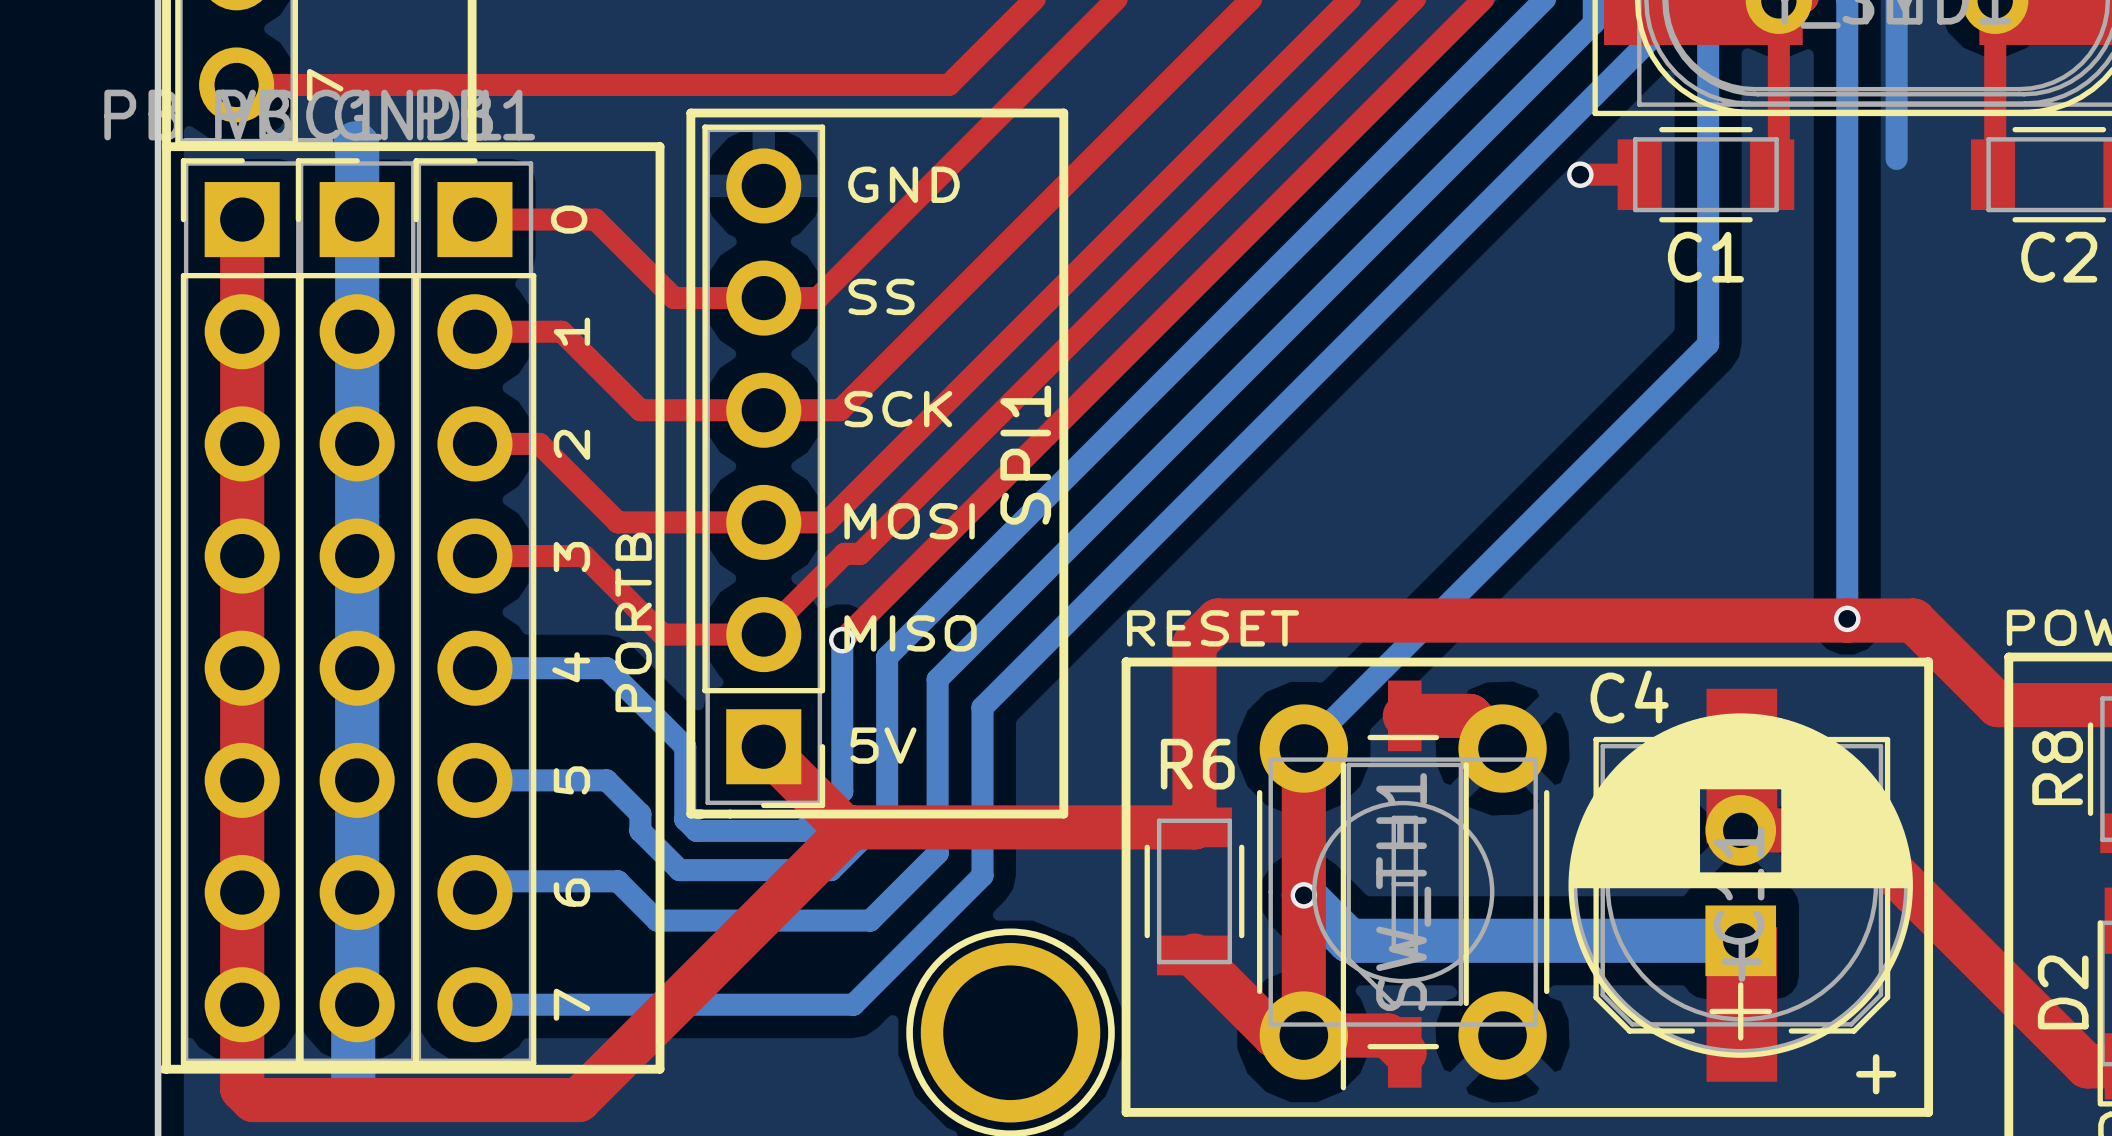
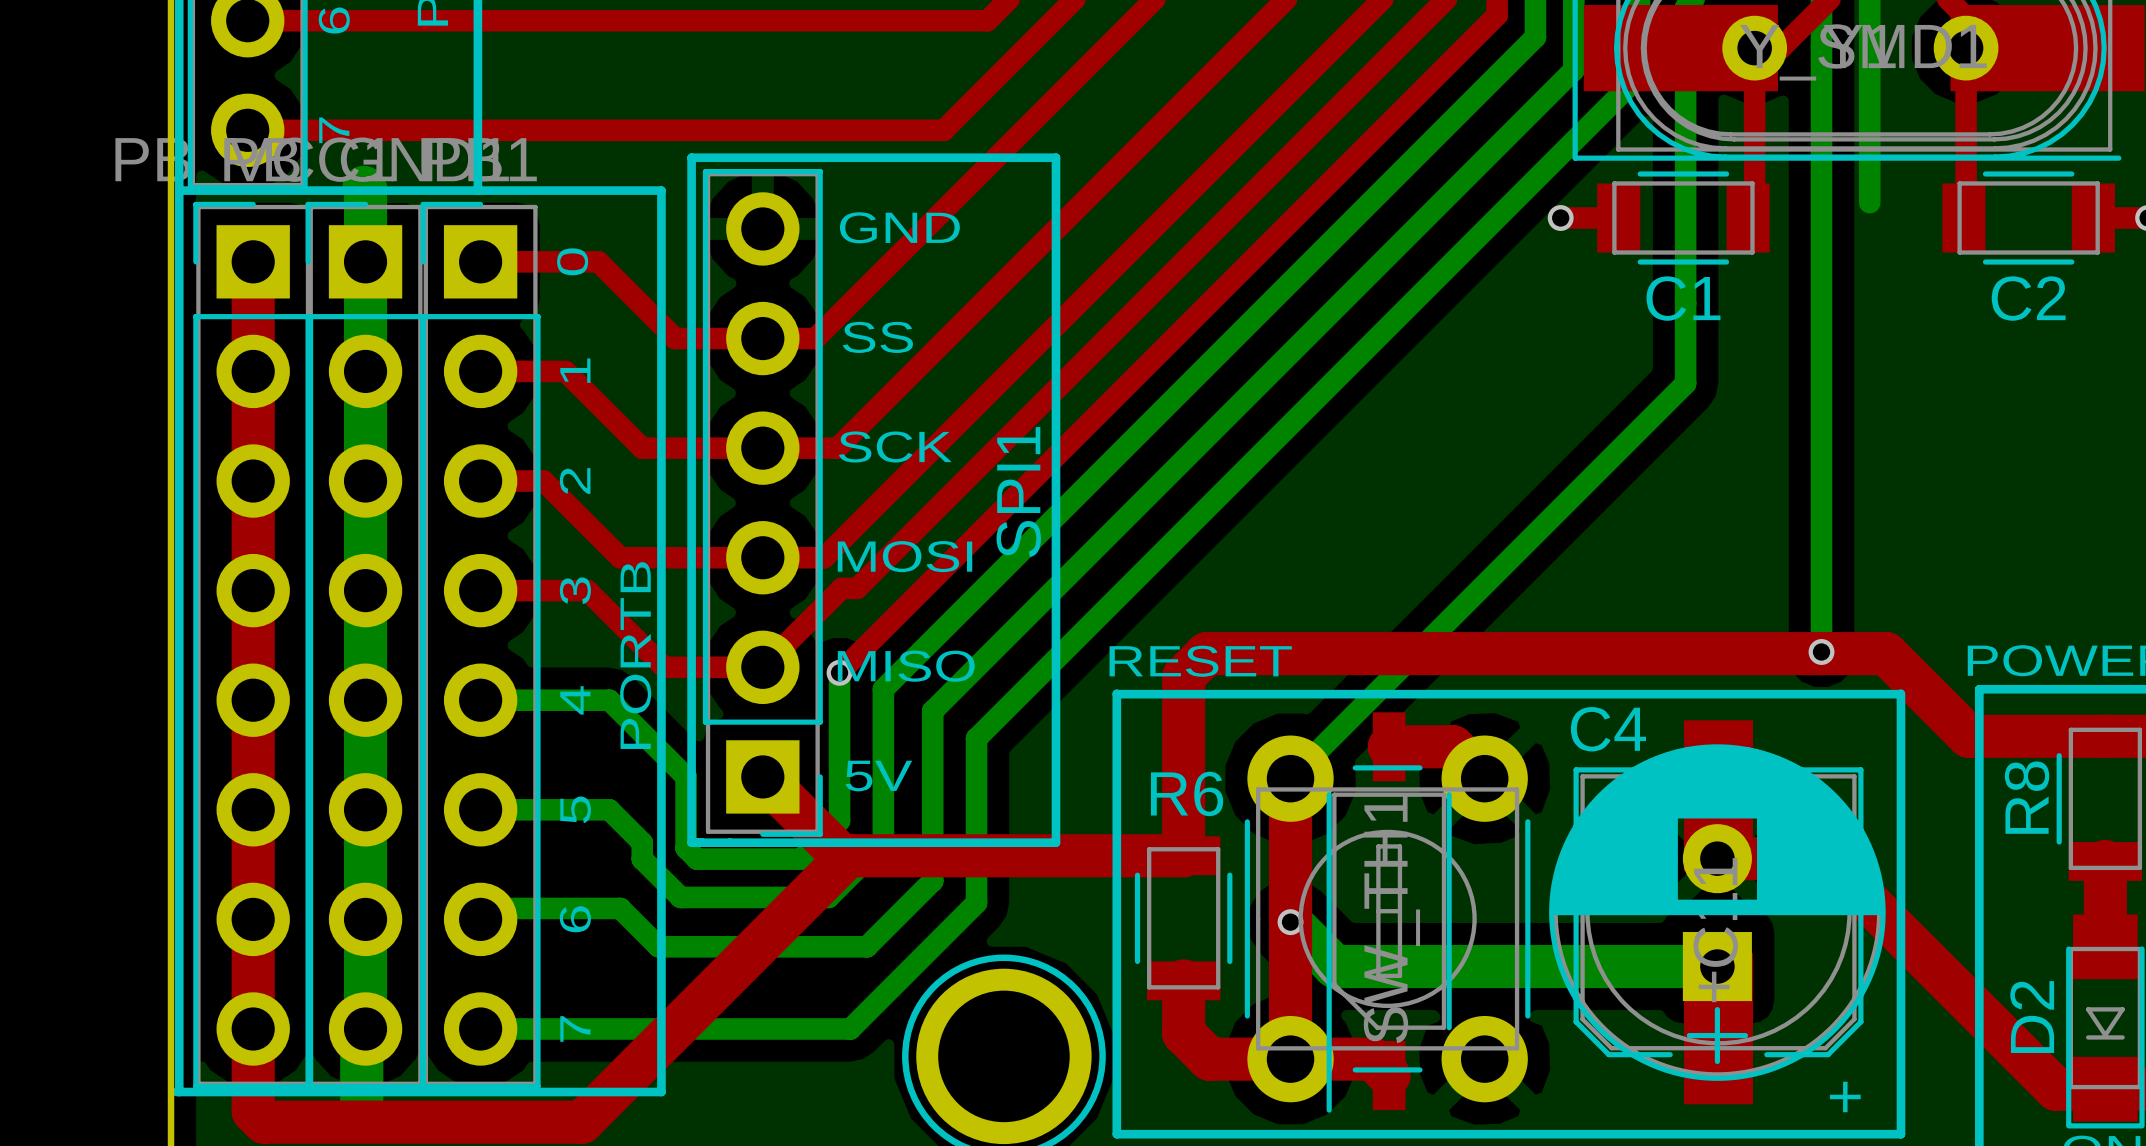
top track: (1194, 955) (1274, 1035) -> (1183, 980) (1183, 1033) (1209, 1059) (1261, 1059)

